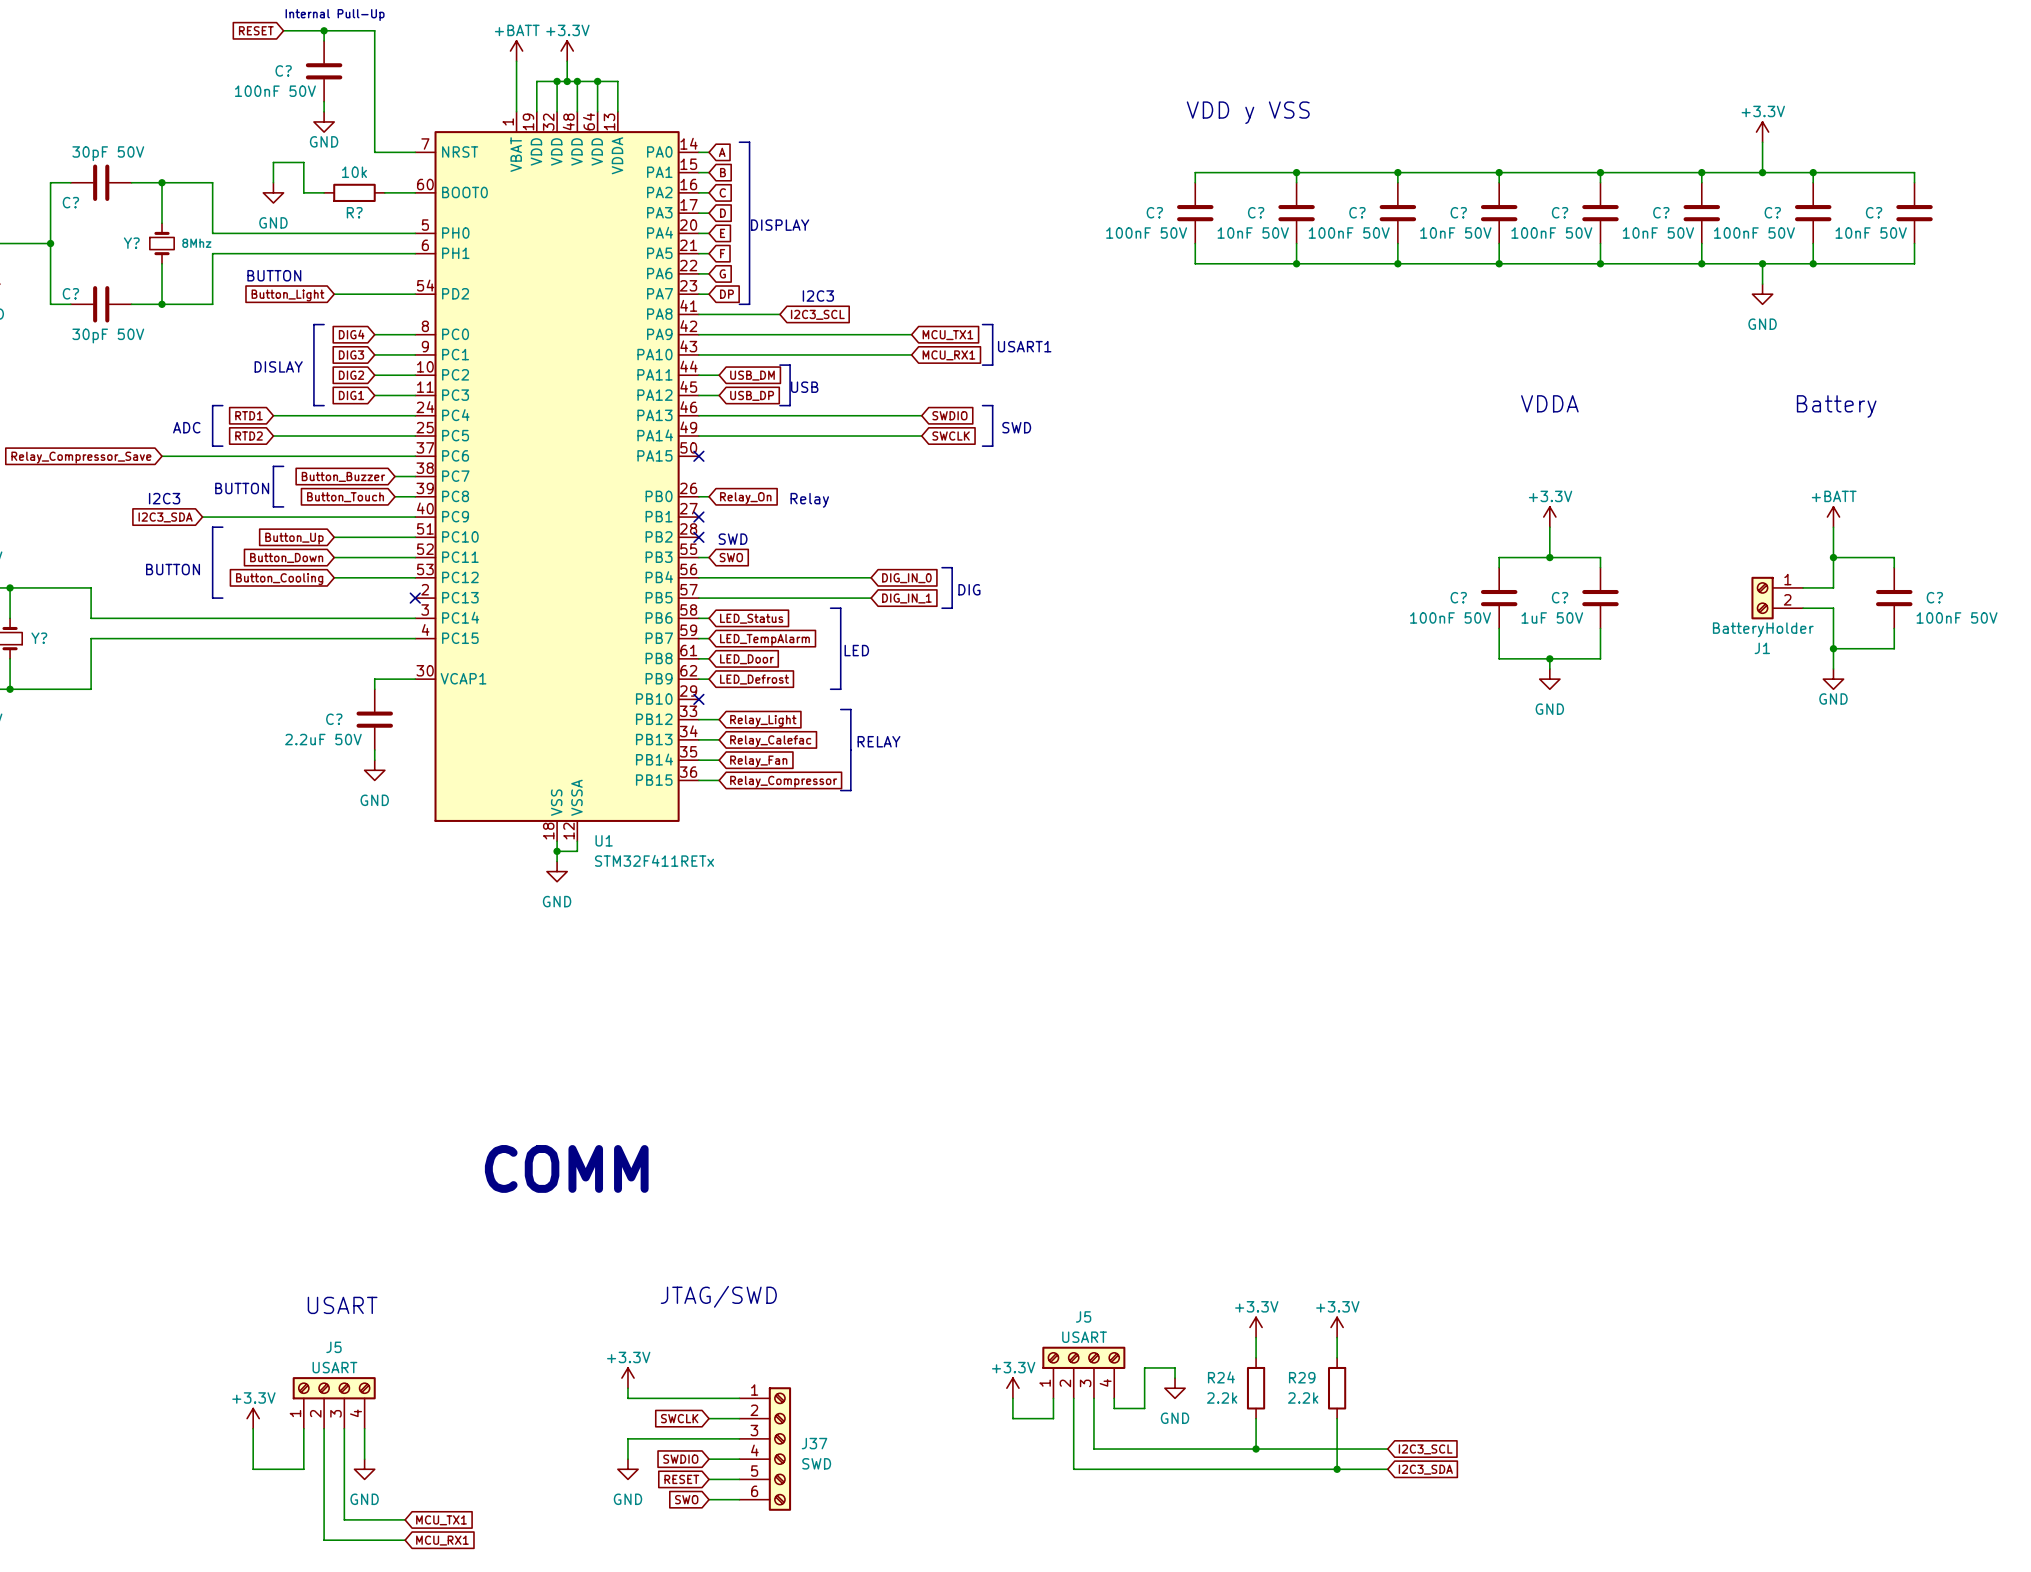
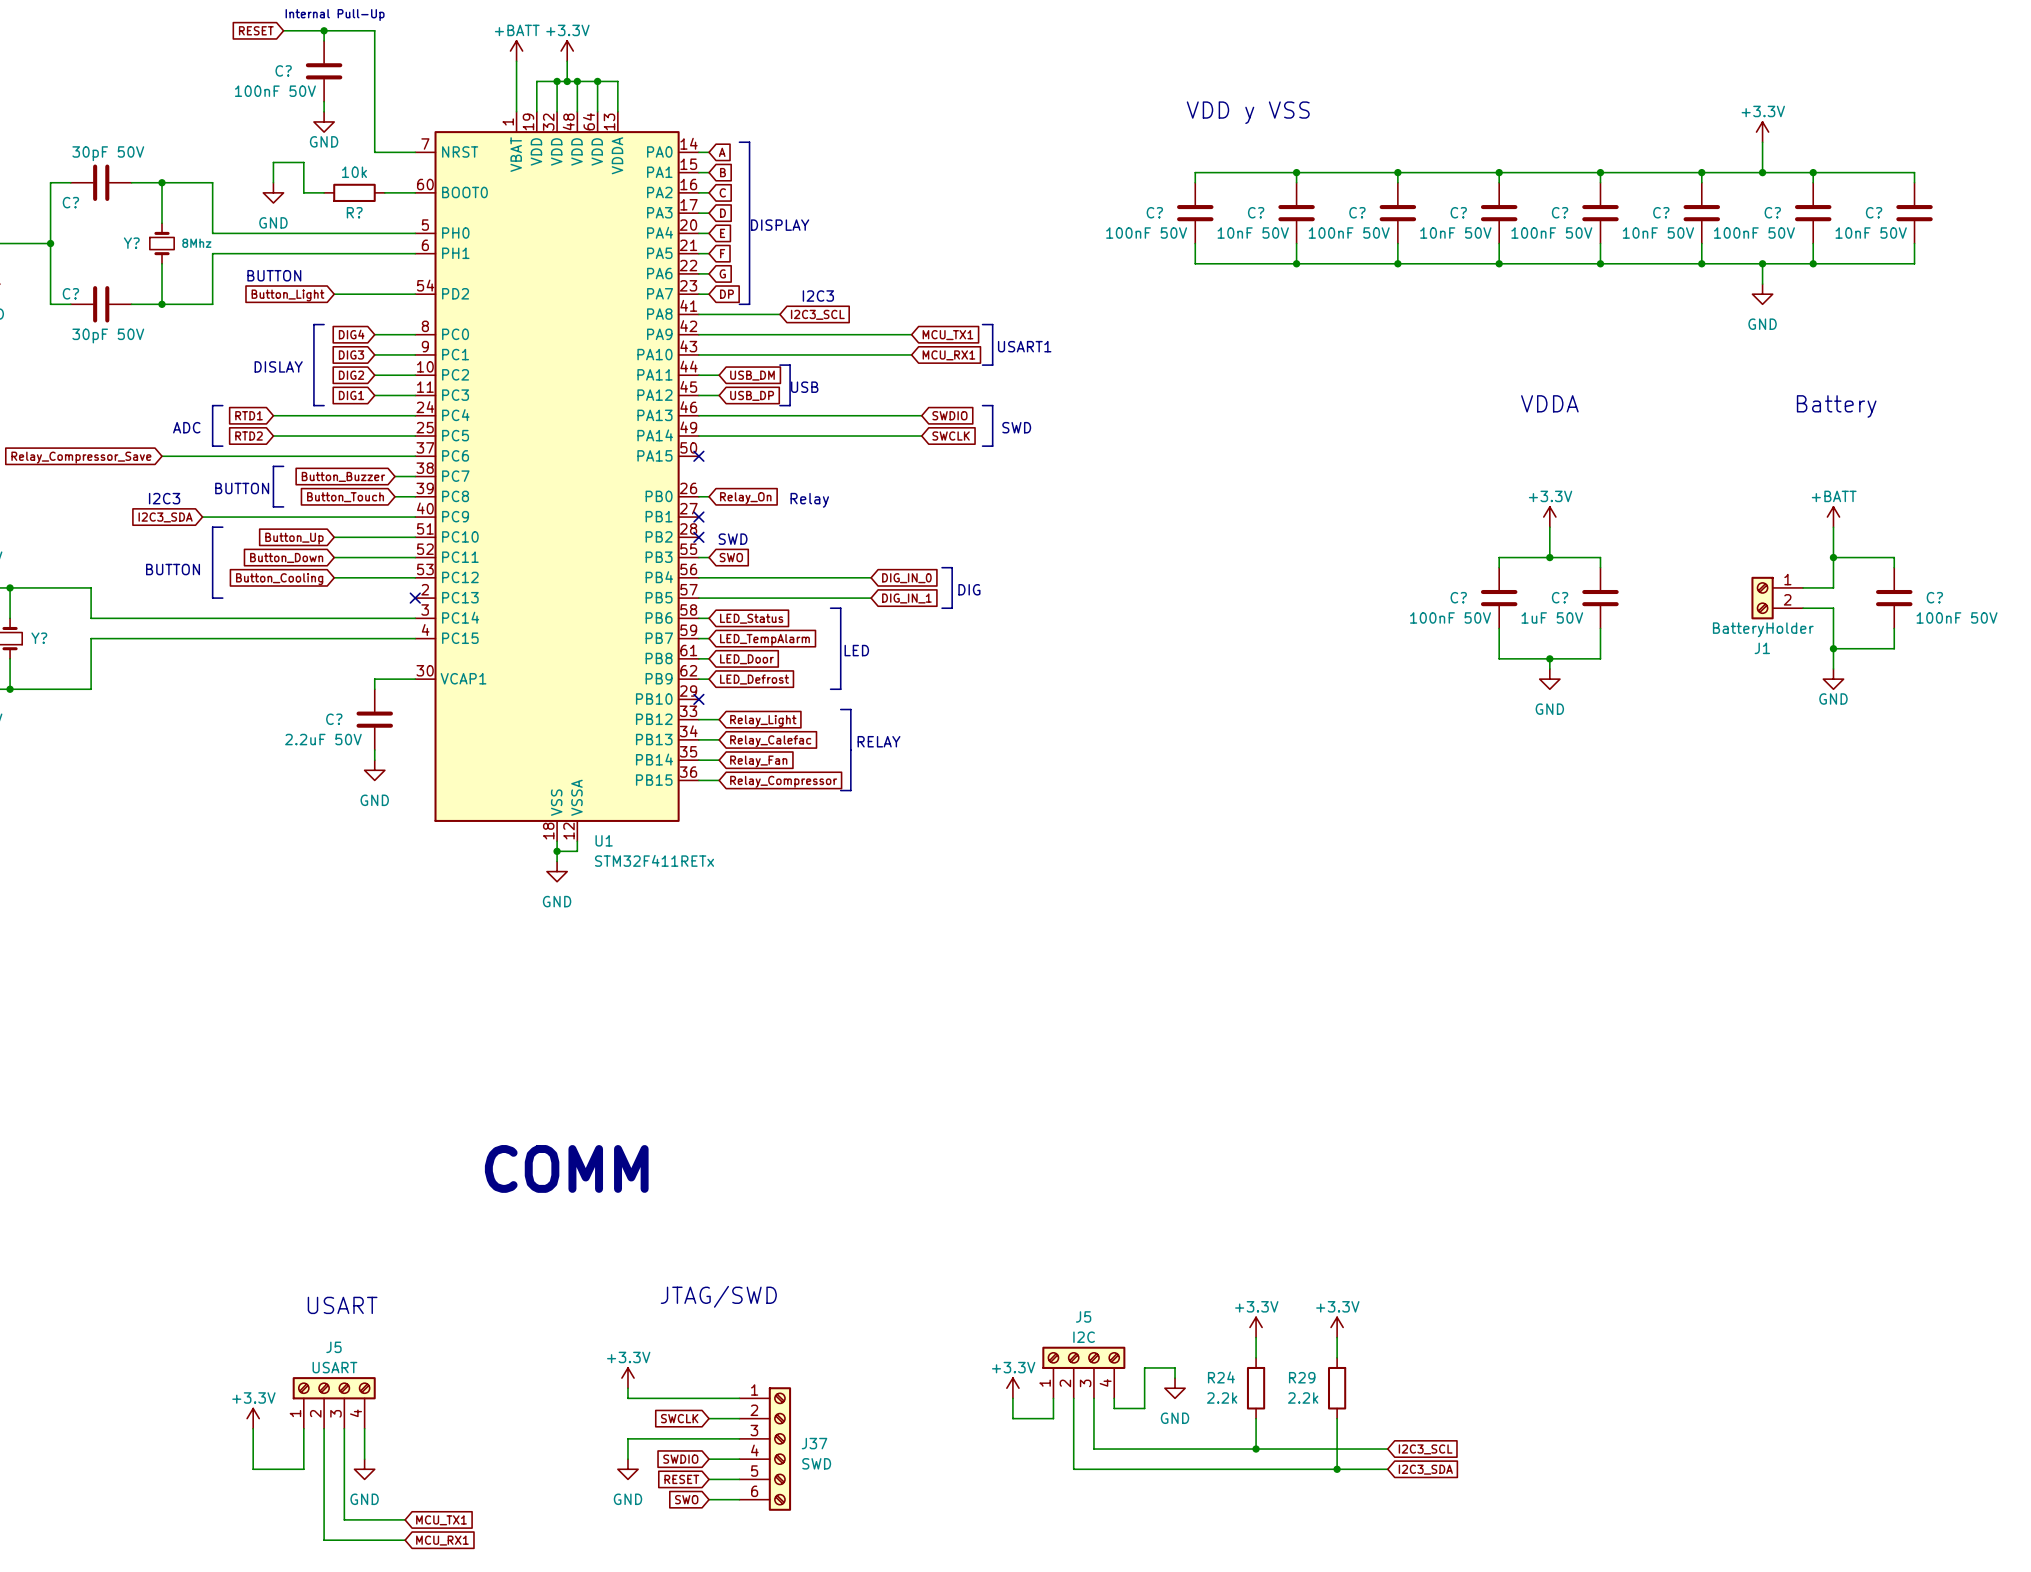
J5 value: USART (1084, 1337) -> I2C (1084, 1337)

